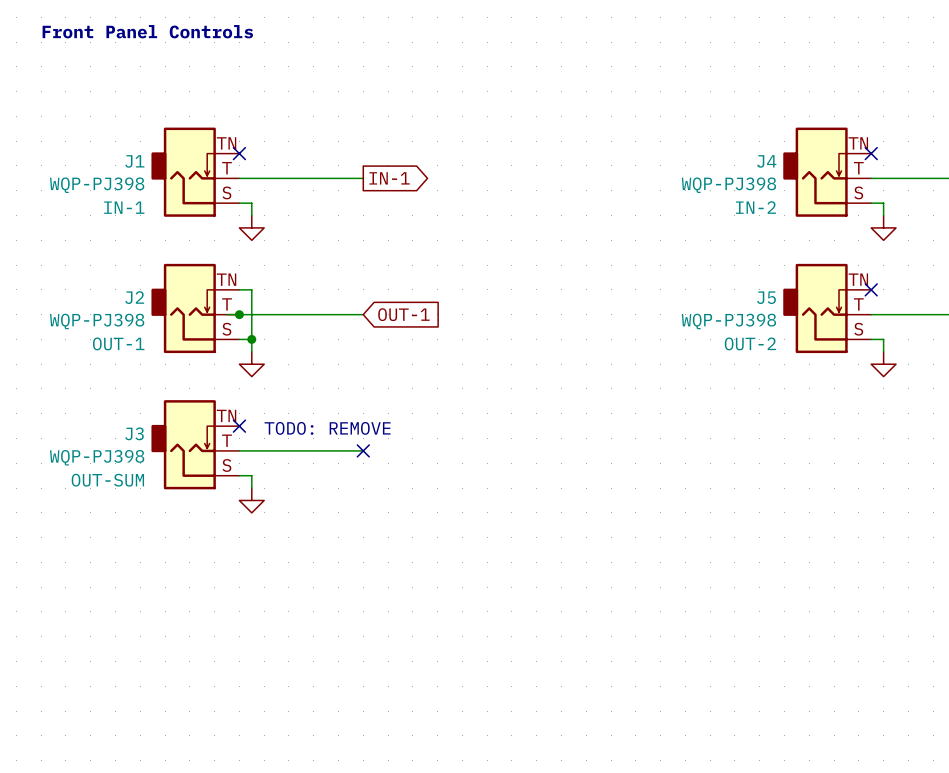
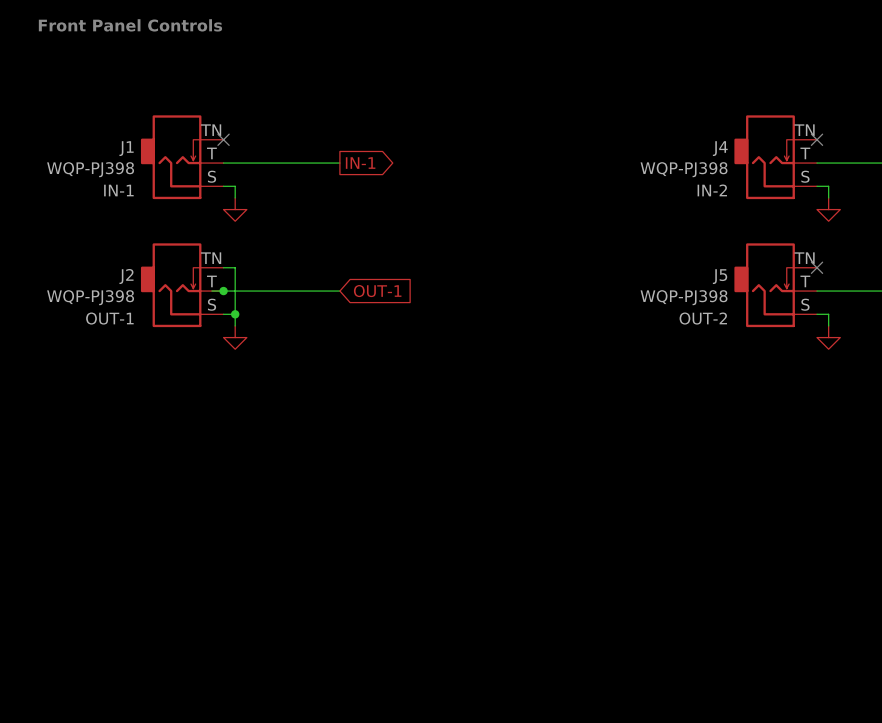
no-connect mark: (239, 426) -> none
text: TODO: REMOVE (327, 428) -> none
J3: WQP-PJ398 (195, 444) -> none
wire: (239, 450) (363, 450) -> none
no-connect mark: (363, 450) -> none
wire: (239, 475) (251, 475) (251, 488) -> none
power symbol: (251, 500) -> none

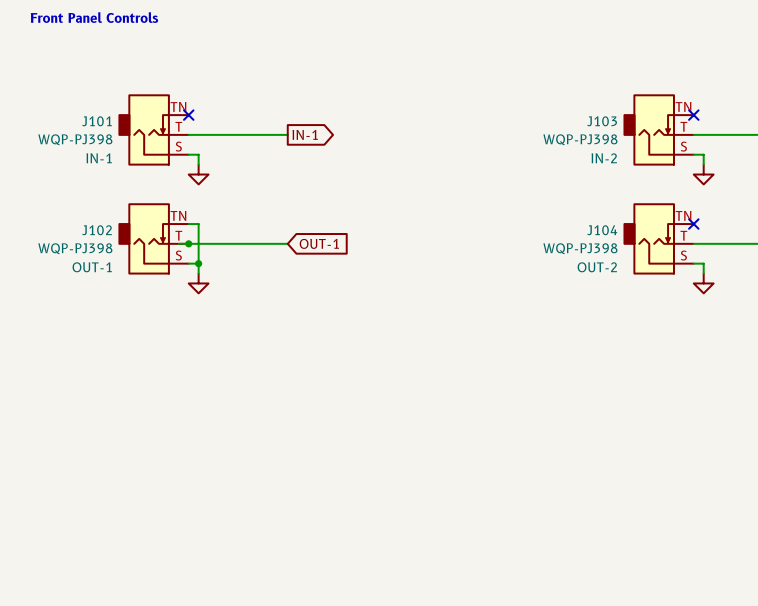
J1 name: J1 (126, 148) -> J101 (97, 121)
J4 name: J4 (720, 148) -> J103 (602, 121)
J2 name: J2 (126, 276) -> J102 (97, 230)
J5 name: J5 (720, 276) -> J104 (602, 230)

